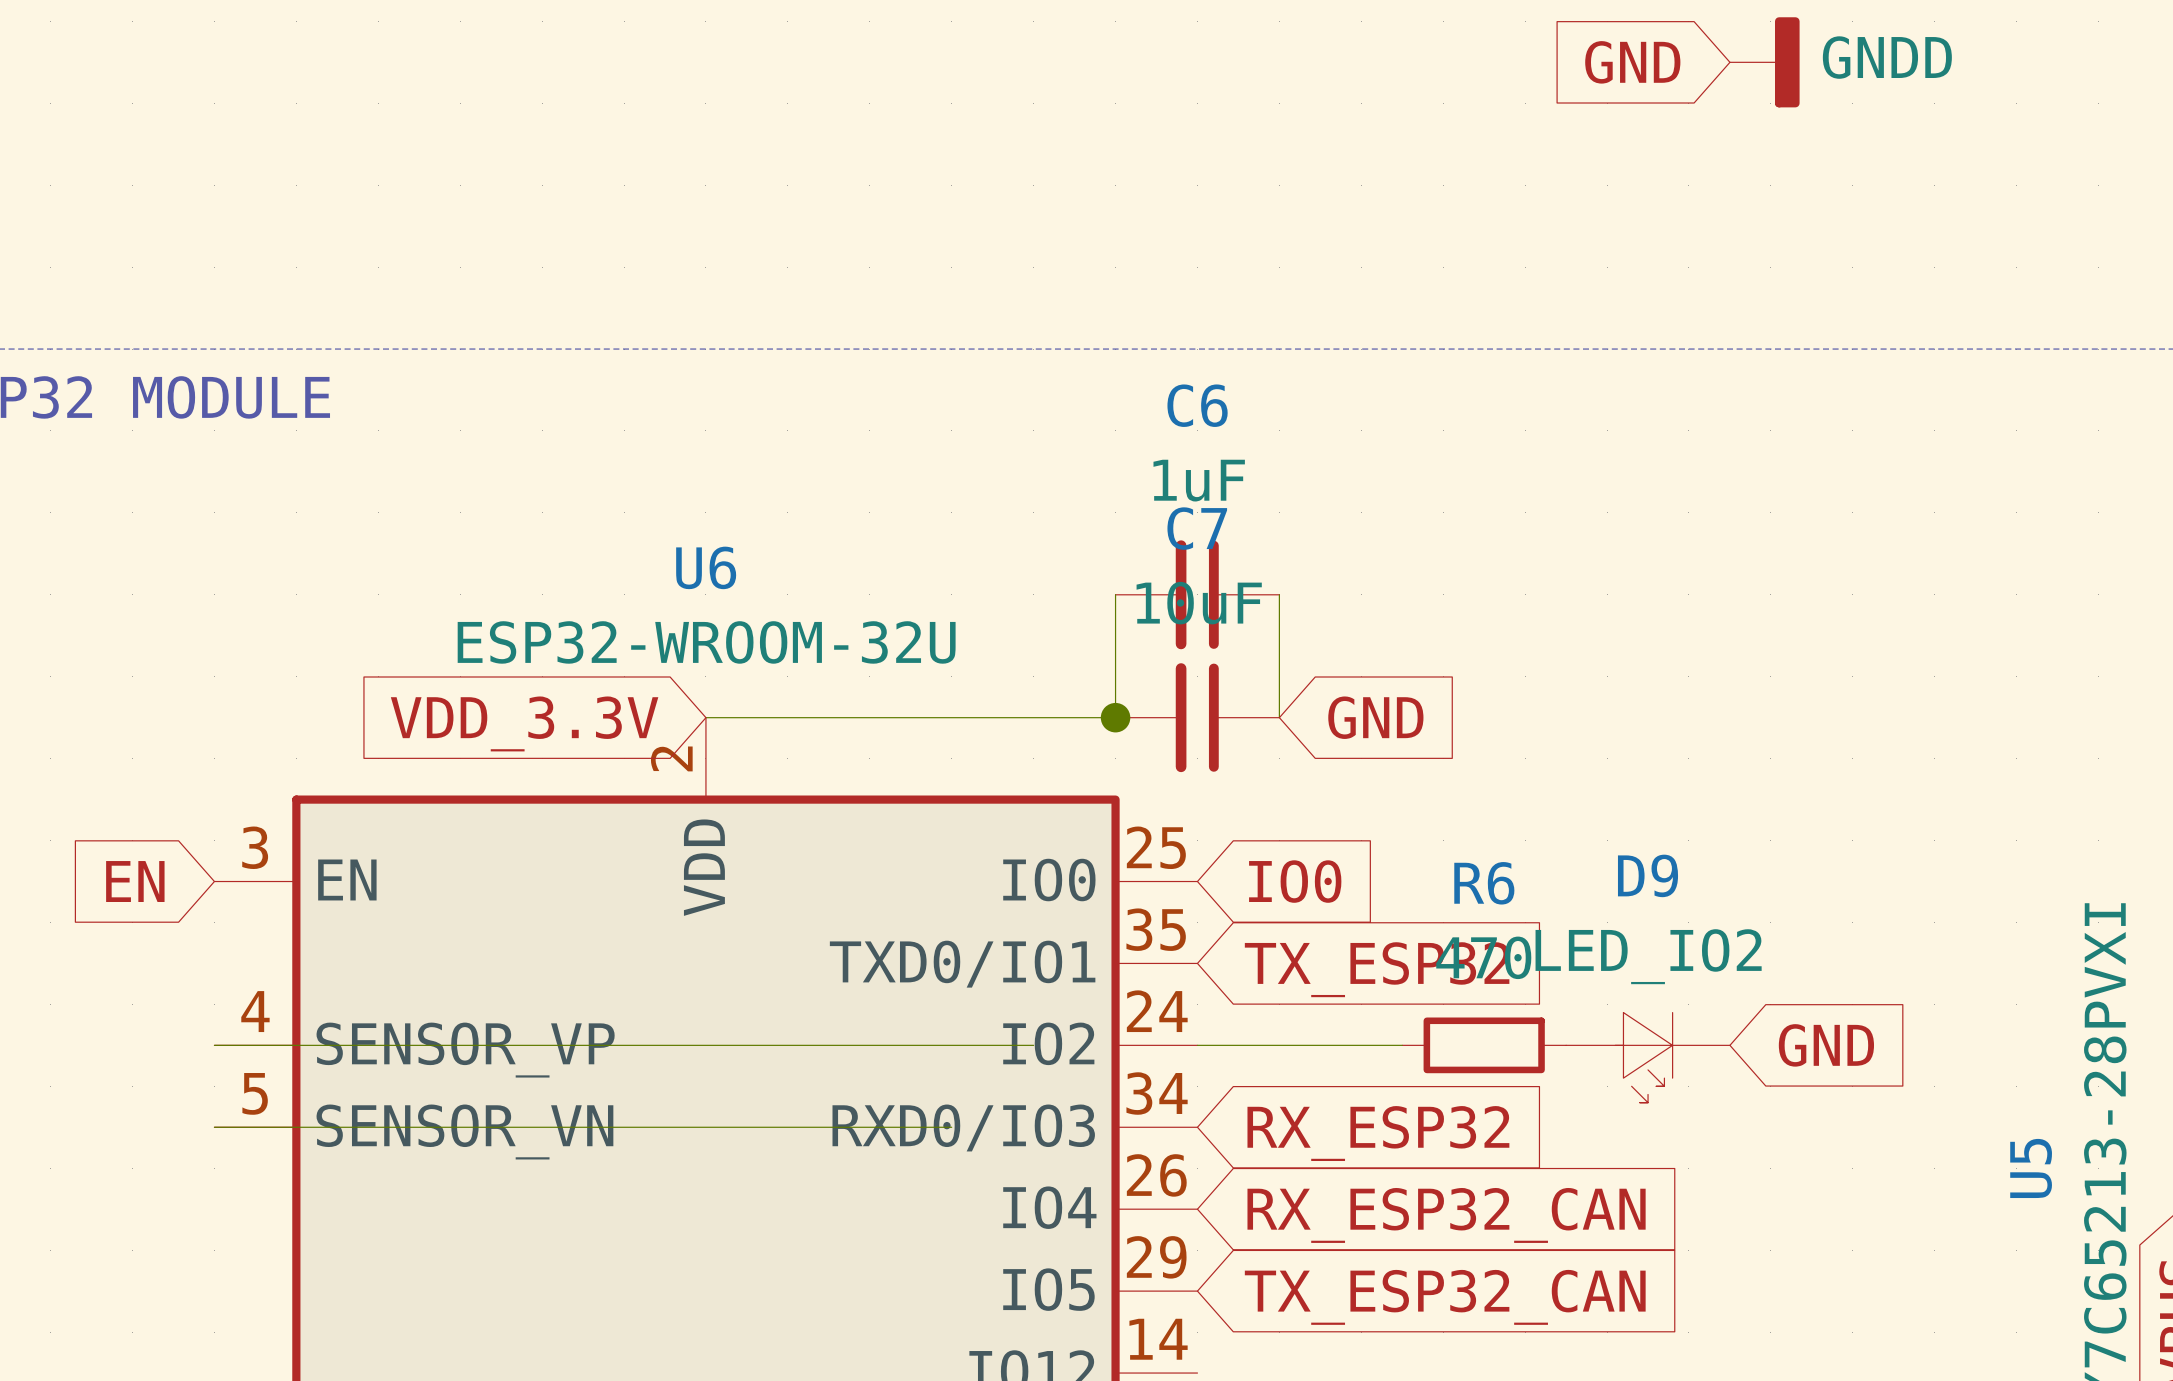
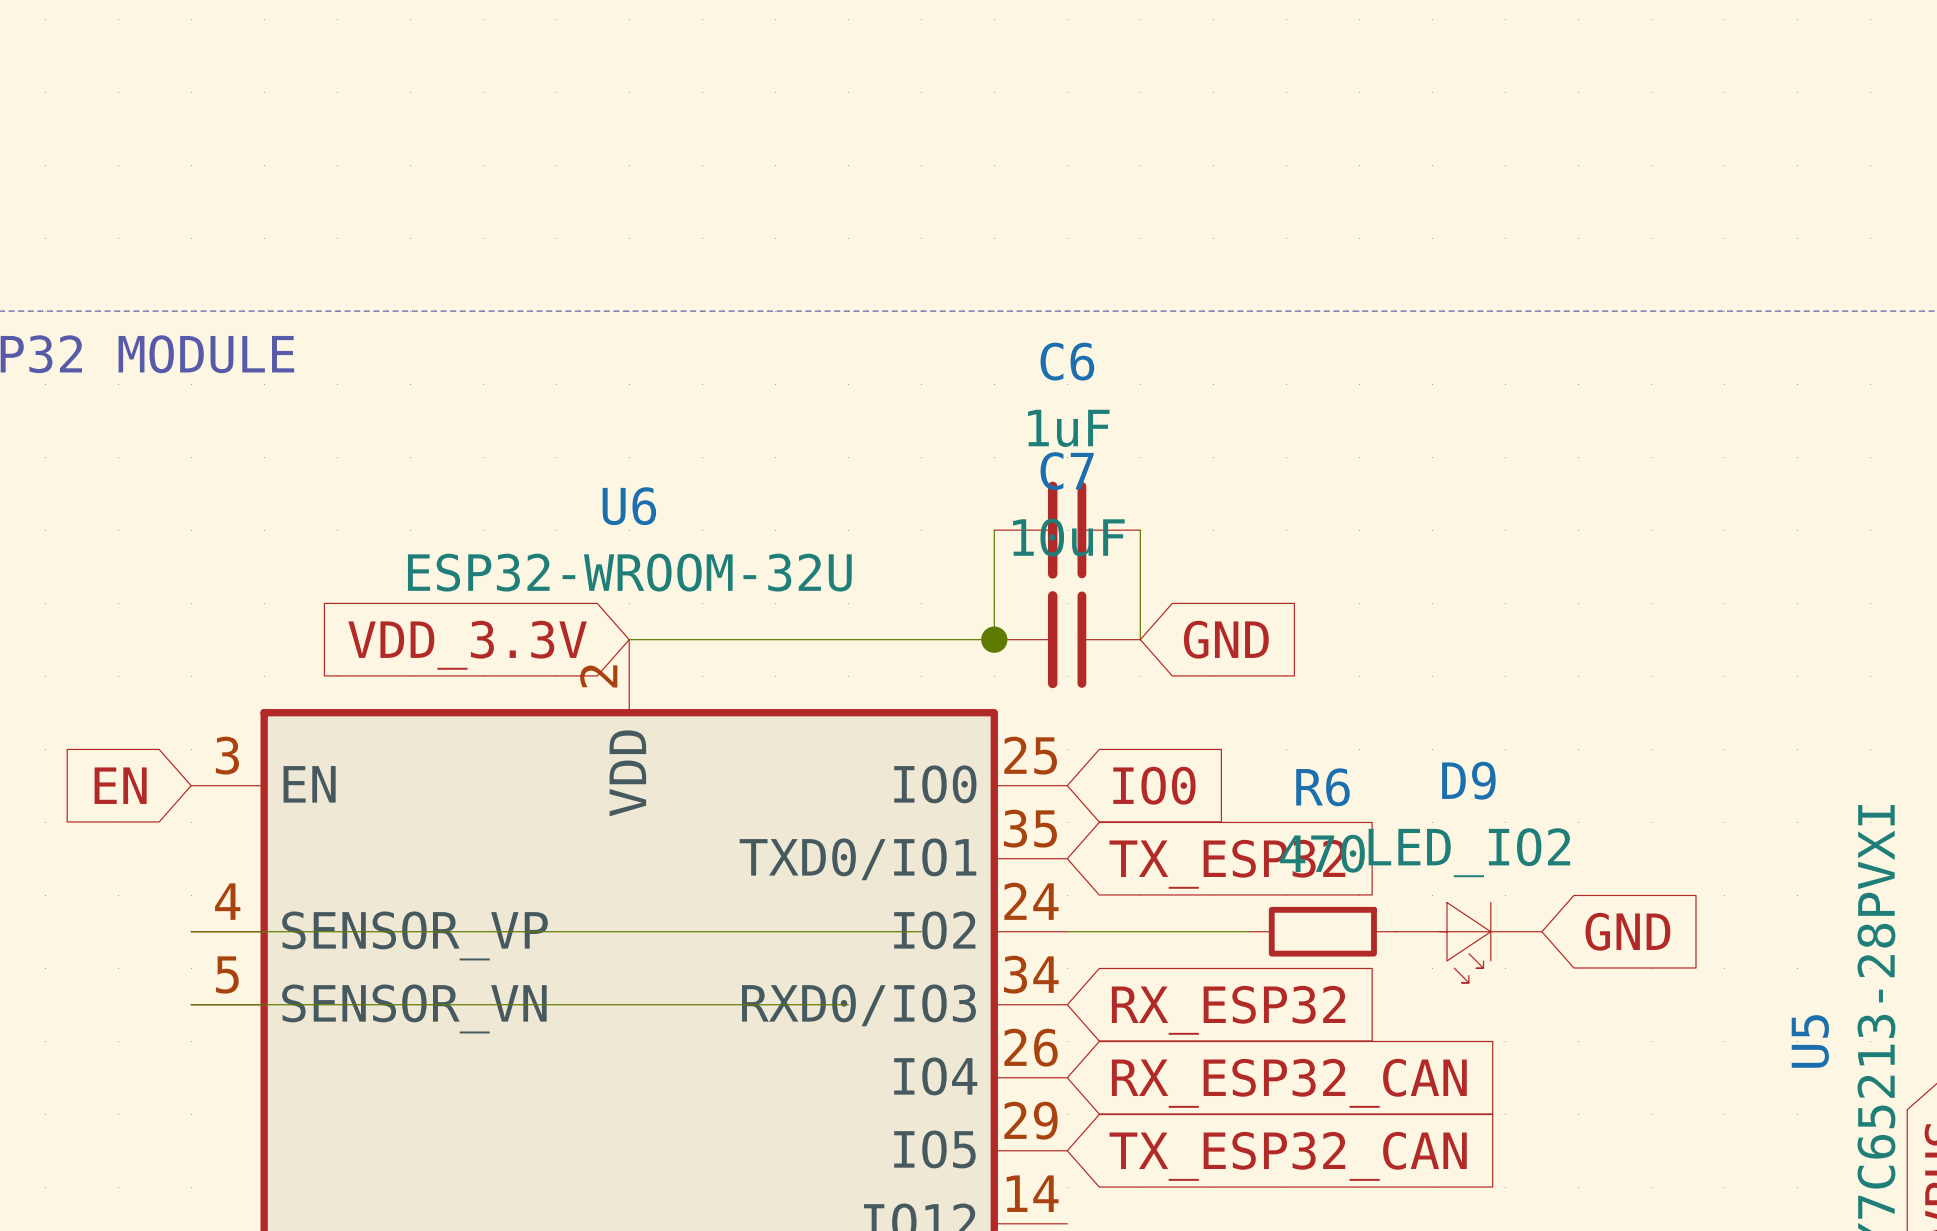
global label: GND (1632, 62) -> none
power symbol: GNDD (1764, 62) -> none

